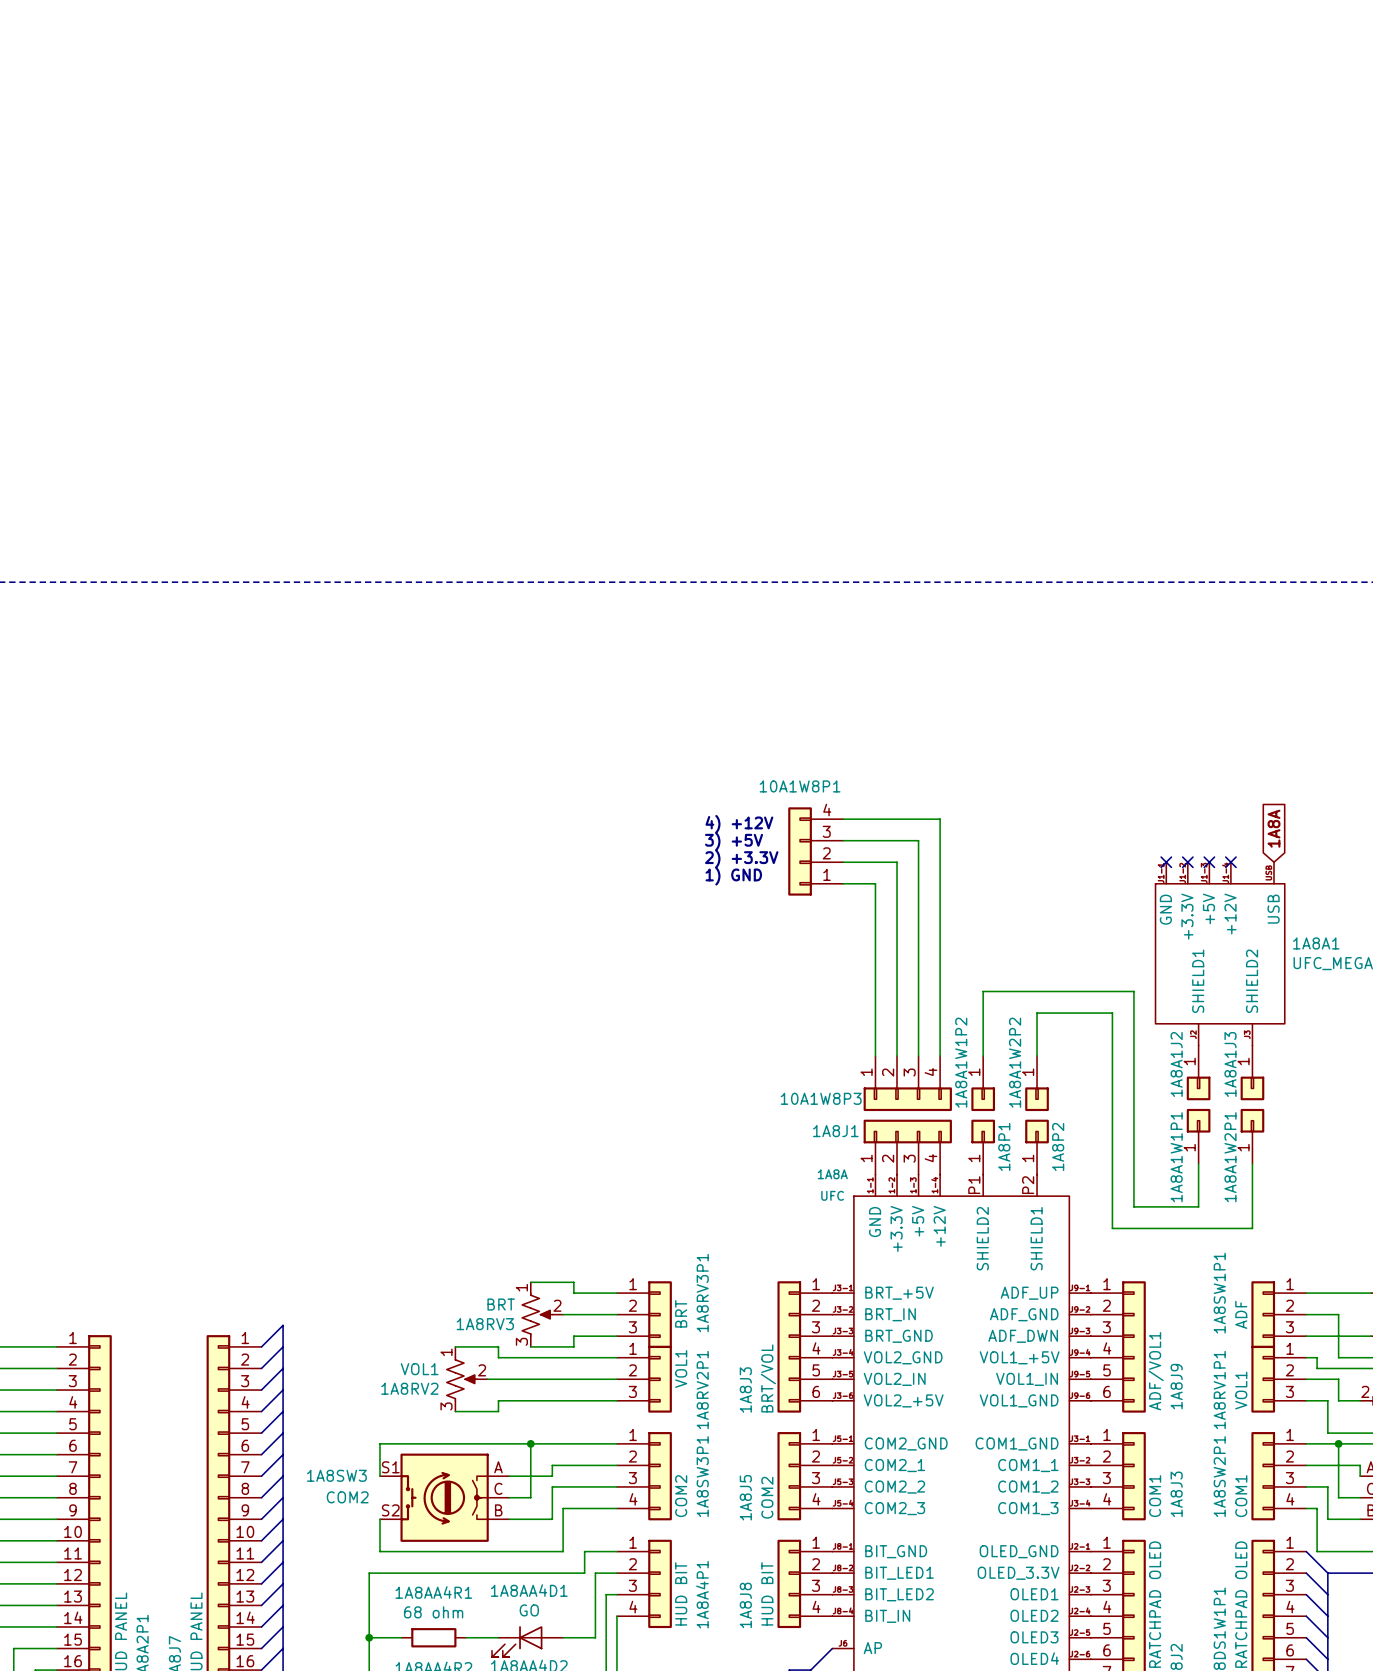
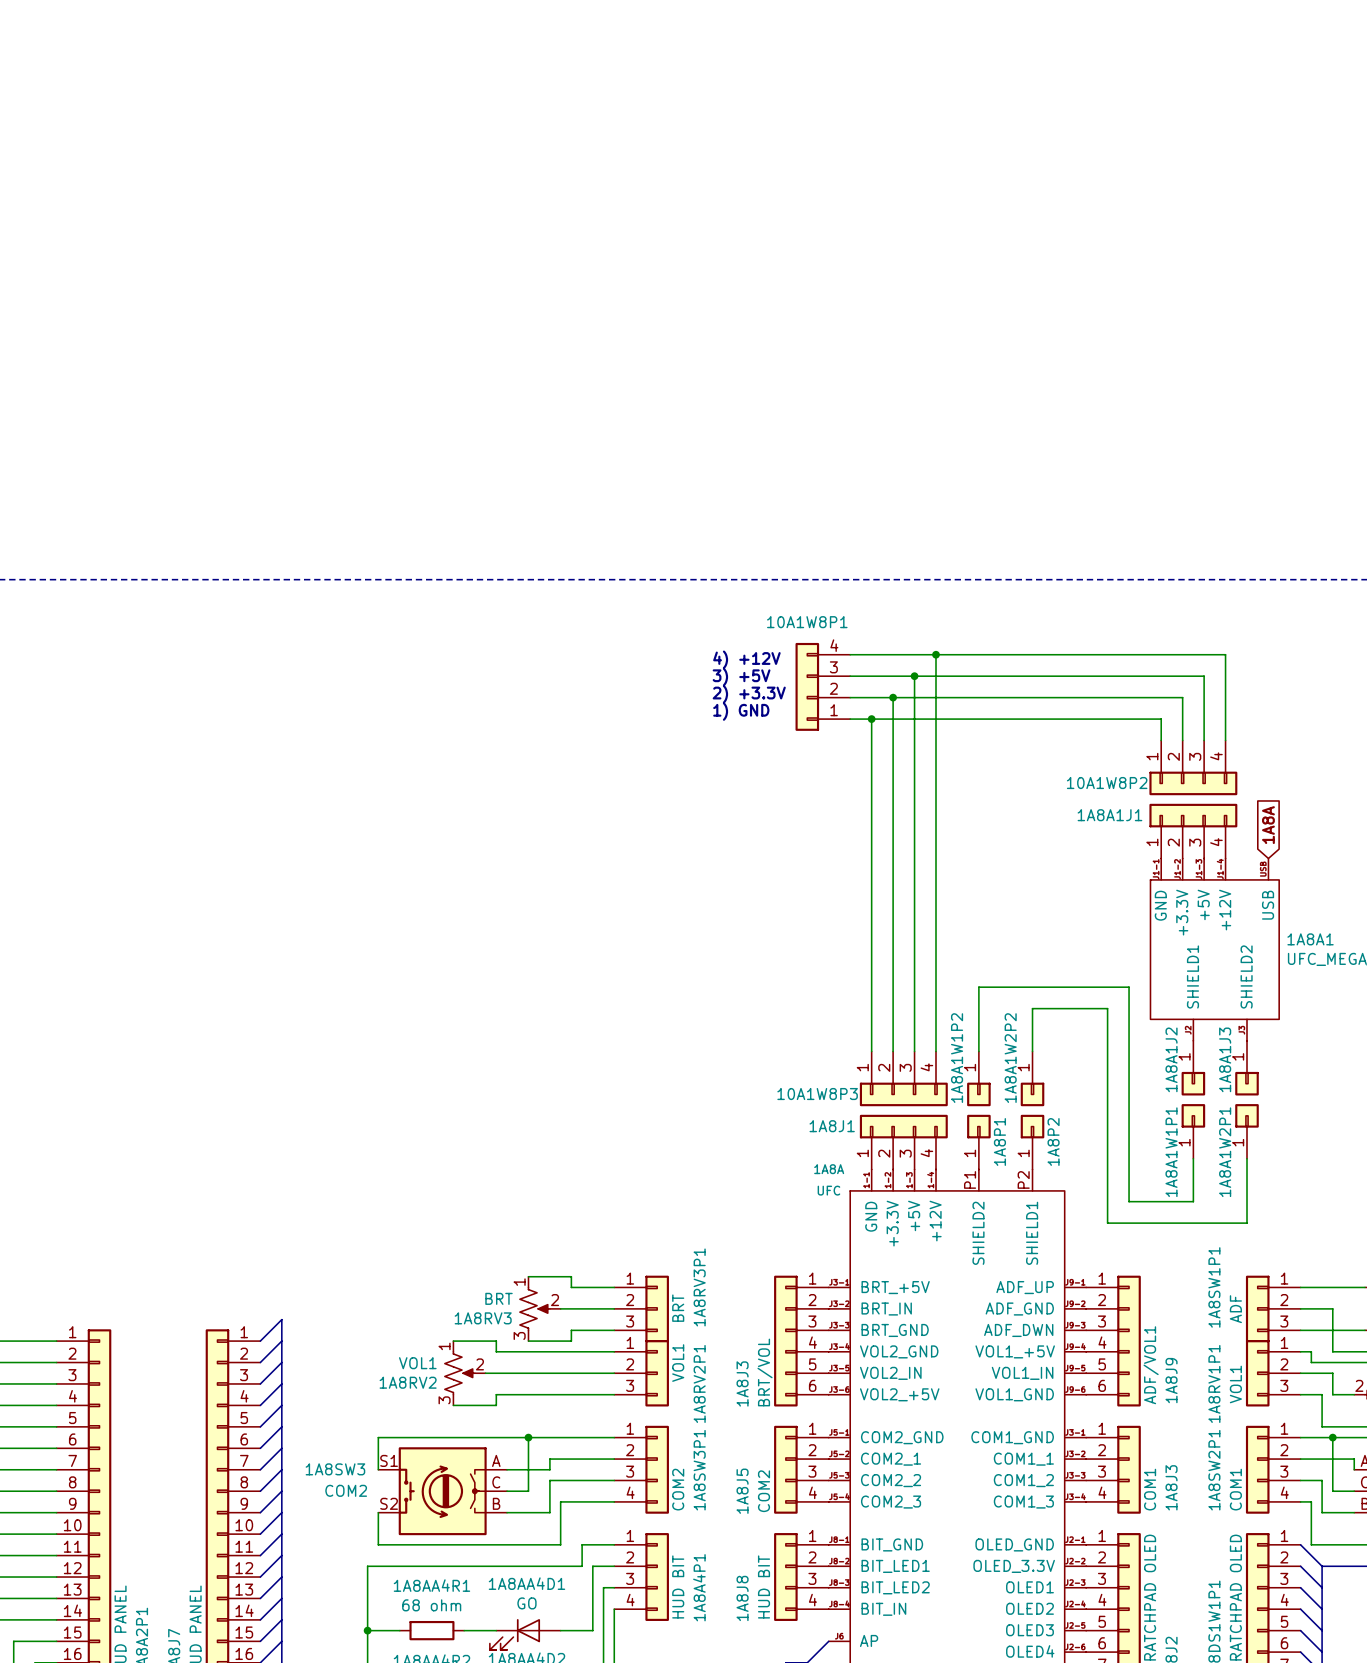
wire: none -> (850, 654) (1225, 654) (1225, 740)
junction: none -> (936, 654)
wire: none -> (850, 676) (1204, 676) (1204, 740)
junction: none -> (914, 676)
wire: none -> (850, 697) (1182, 697) (1182, 740)
junction: none -> (893, 697)
wire: none -> (850, 719) (1161, 719) (1161, 740)
junction: none -> (871, 719)
10A1W8P2: none -> (1193, 767)
wire: (843, 819) (940, 819) -> (936, 654) (936, 815)
text position: 4) +12V (739, 824) -> 4) +12V (746, 659)
1A8A1J1: none -> (1193, 831)
wire: (843, 840) (918, 840) -> (914, 676) (914, 837)
text position: 3) +5V (734, 841) -> 3) +5V (741, 677)
10A1W8P1 position: (815, 851) -> (822, 686)
text position: 2) +3.3V (741, 858) -> 2) +3.3V (749, 694)
wire: (843, 862) (897, 862) -> (893, 697) (893, 858)
no-connect mark: (1166, 862) -> none
no-connect mark: (1187, 862) -> none
no-connect mark: (1209, 862) -> none
no-connect mark: (1230, 862) -> none
text position: 1) GND (733, 876) -> 1) GND (741, 711)
wire: (843, 883) (875, 883) -> (871, 719) (871, 879)

